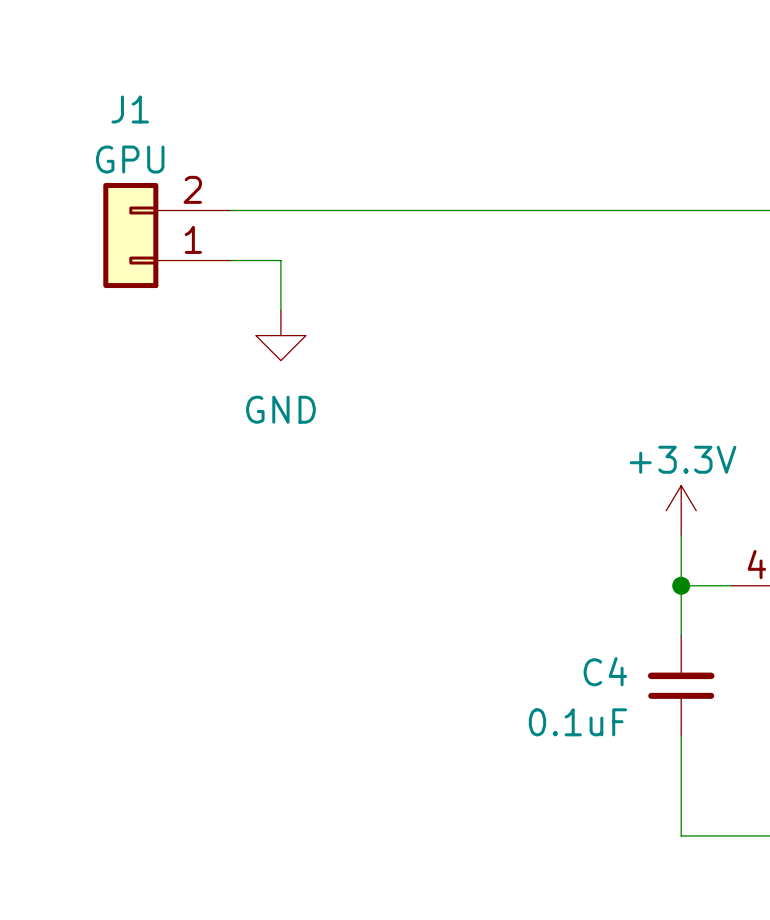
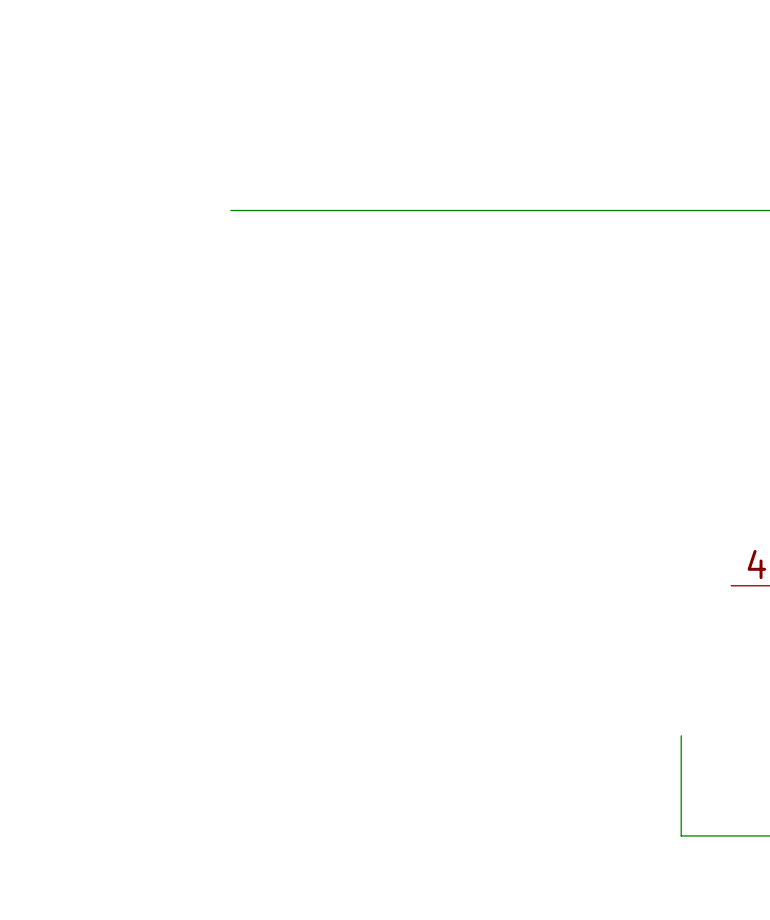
J1: GPU (167, 235) -> none
wire: (230, 260) (280, 260) (280, 310) -> none
power symbol: GND (280, 335) -> none
power symbol: +3.3V (681, 510) -> none
wire: (681, 535) (681, 635) -> none
wire: (681, 585) (731, 585) -> none
junction: (681, 585) -> none
C4: 0.1uF (681, 685) -> none

